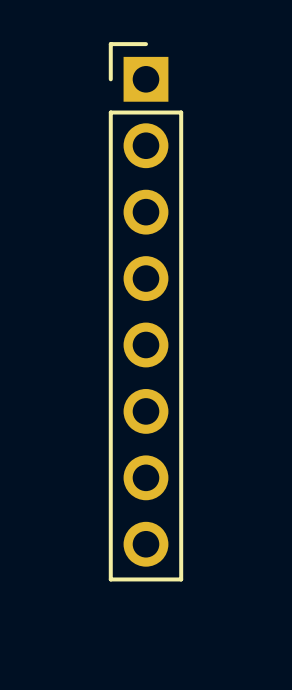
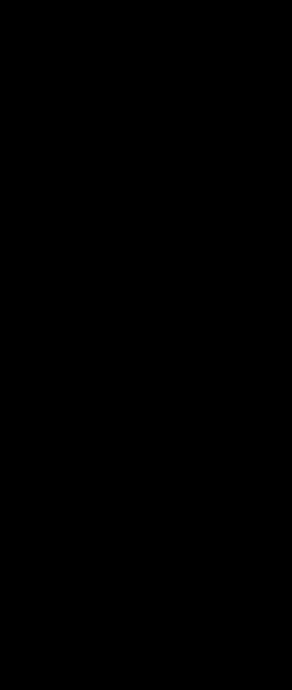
part: (145, 311) -> none

